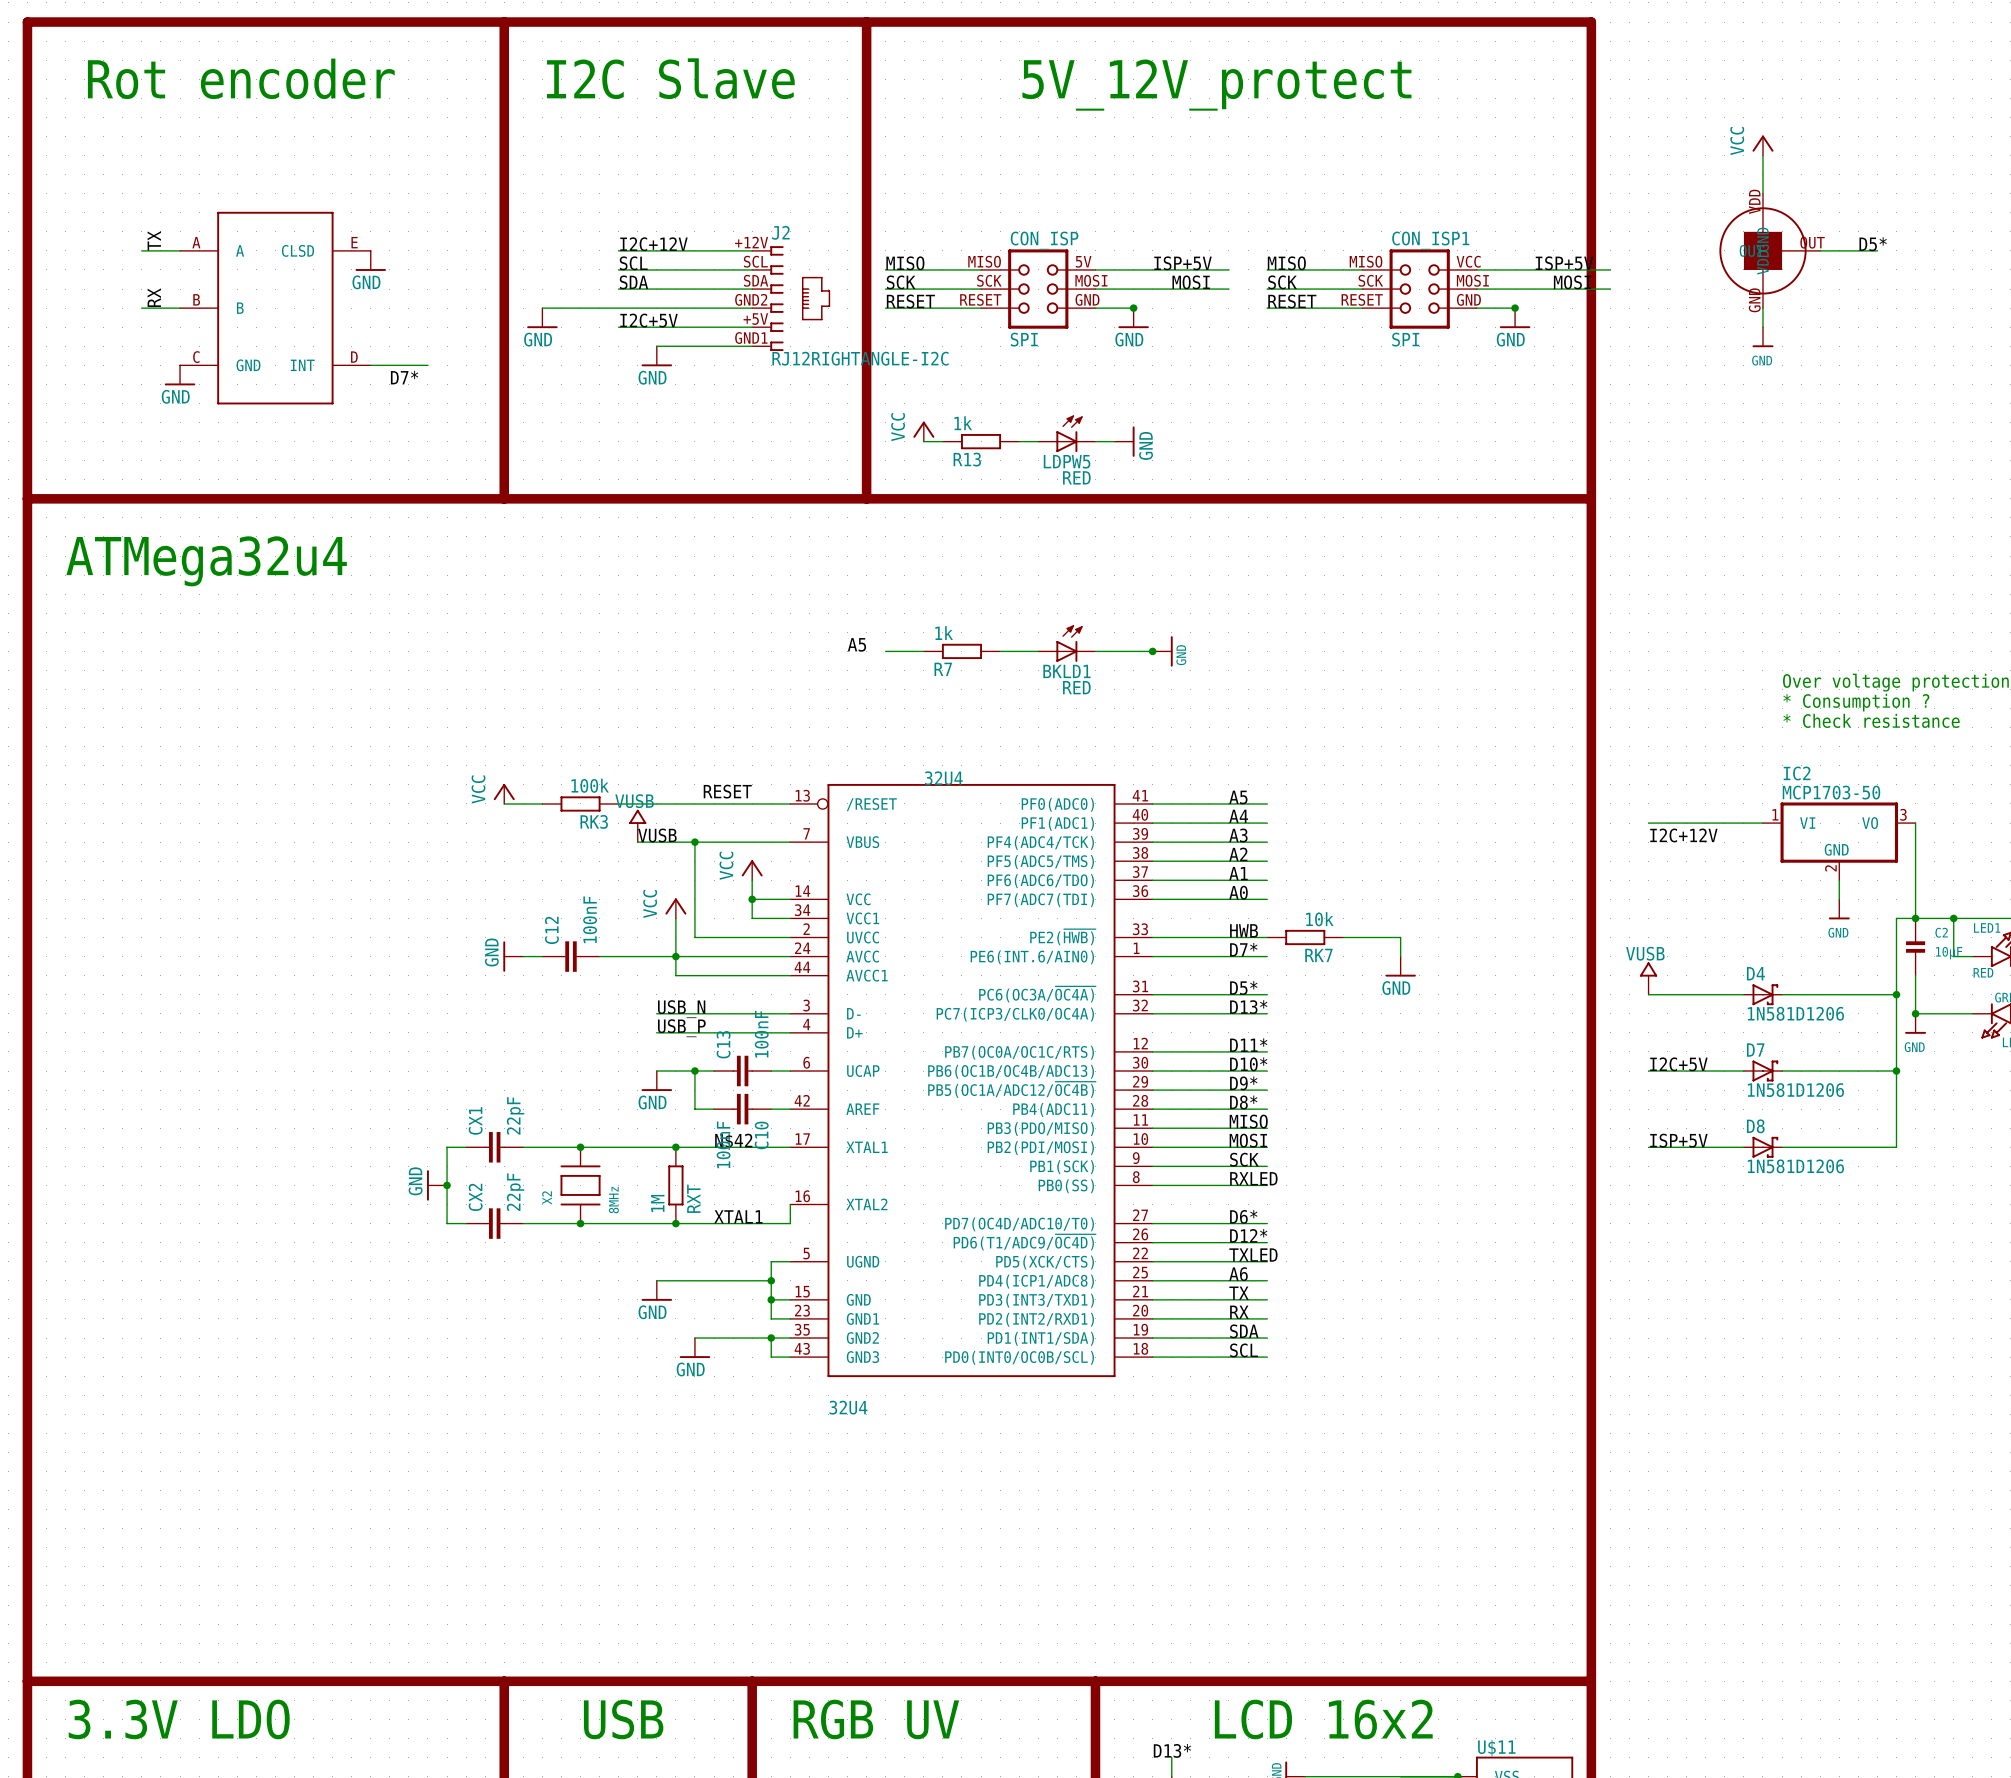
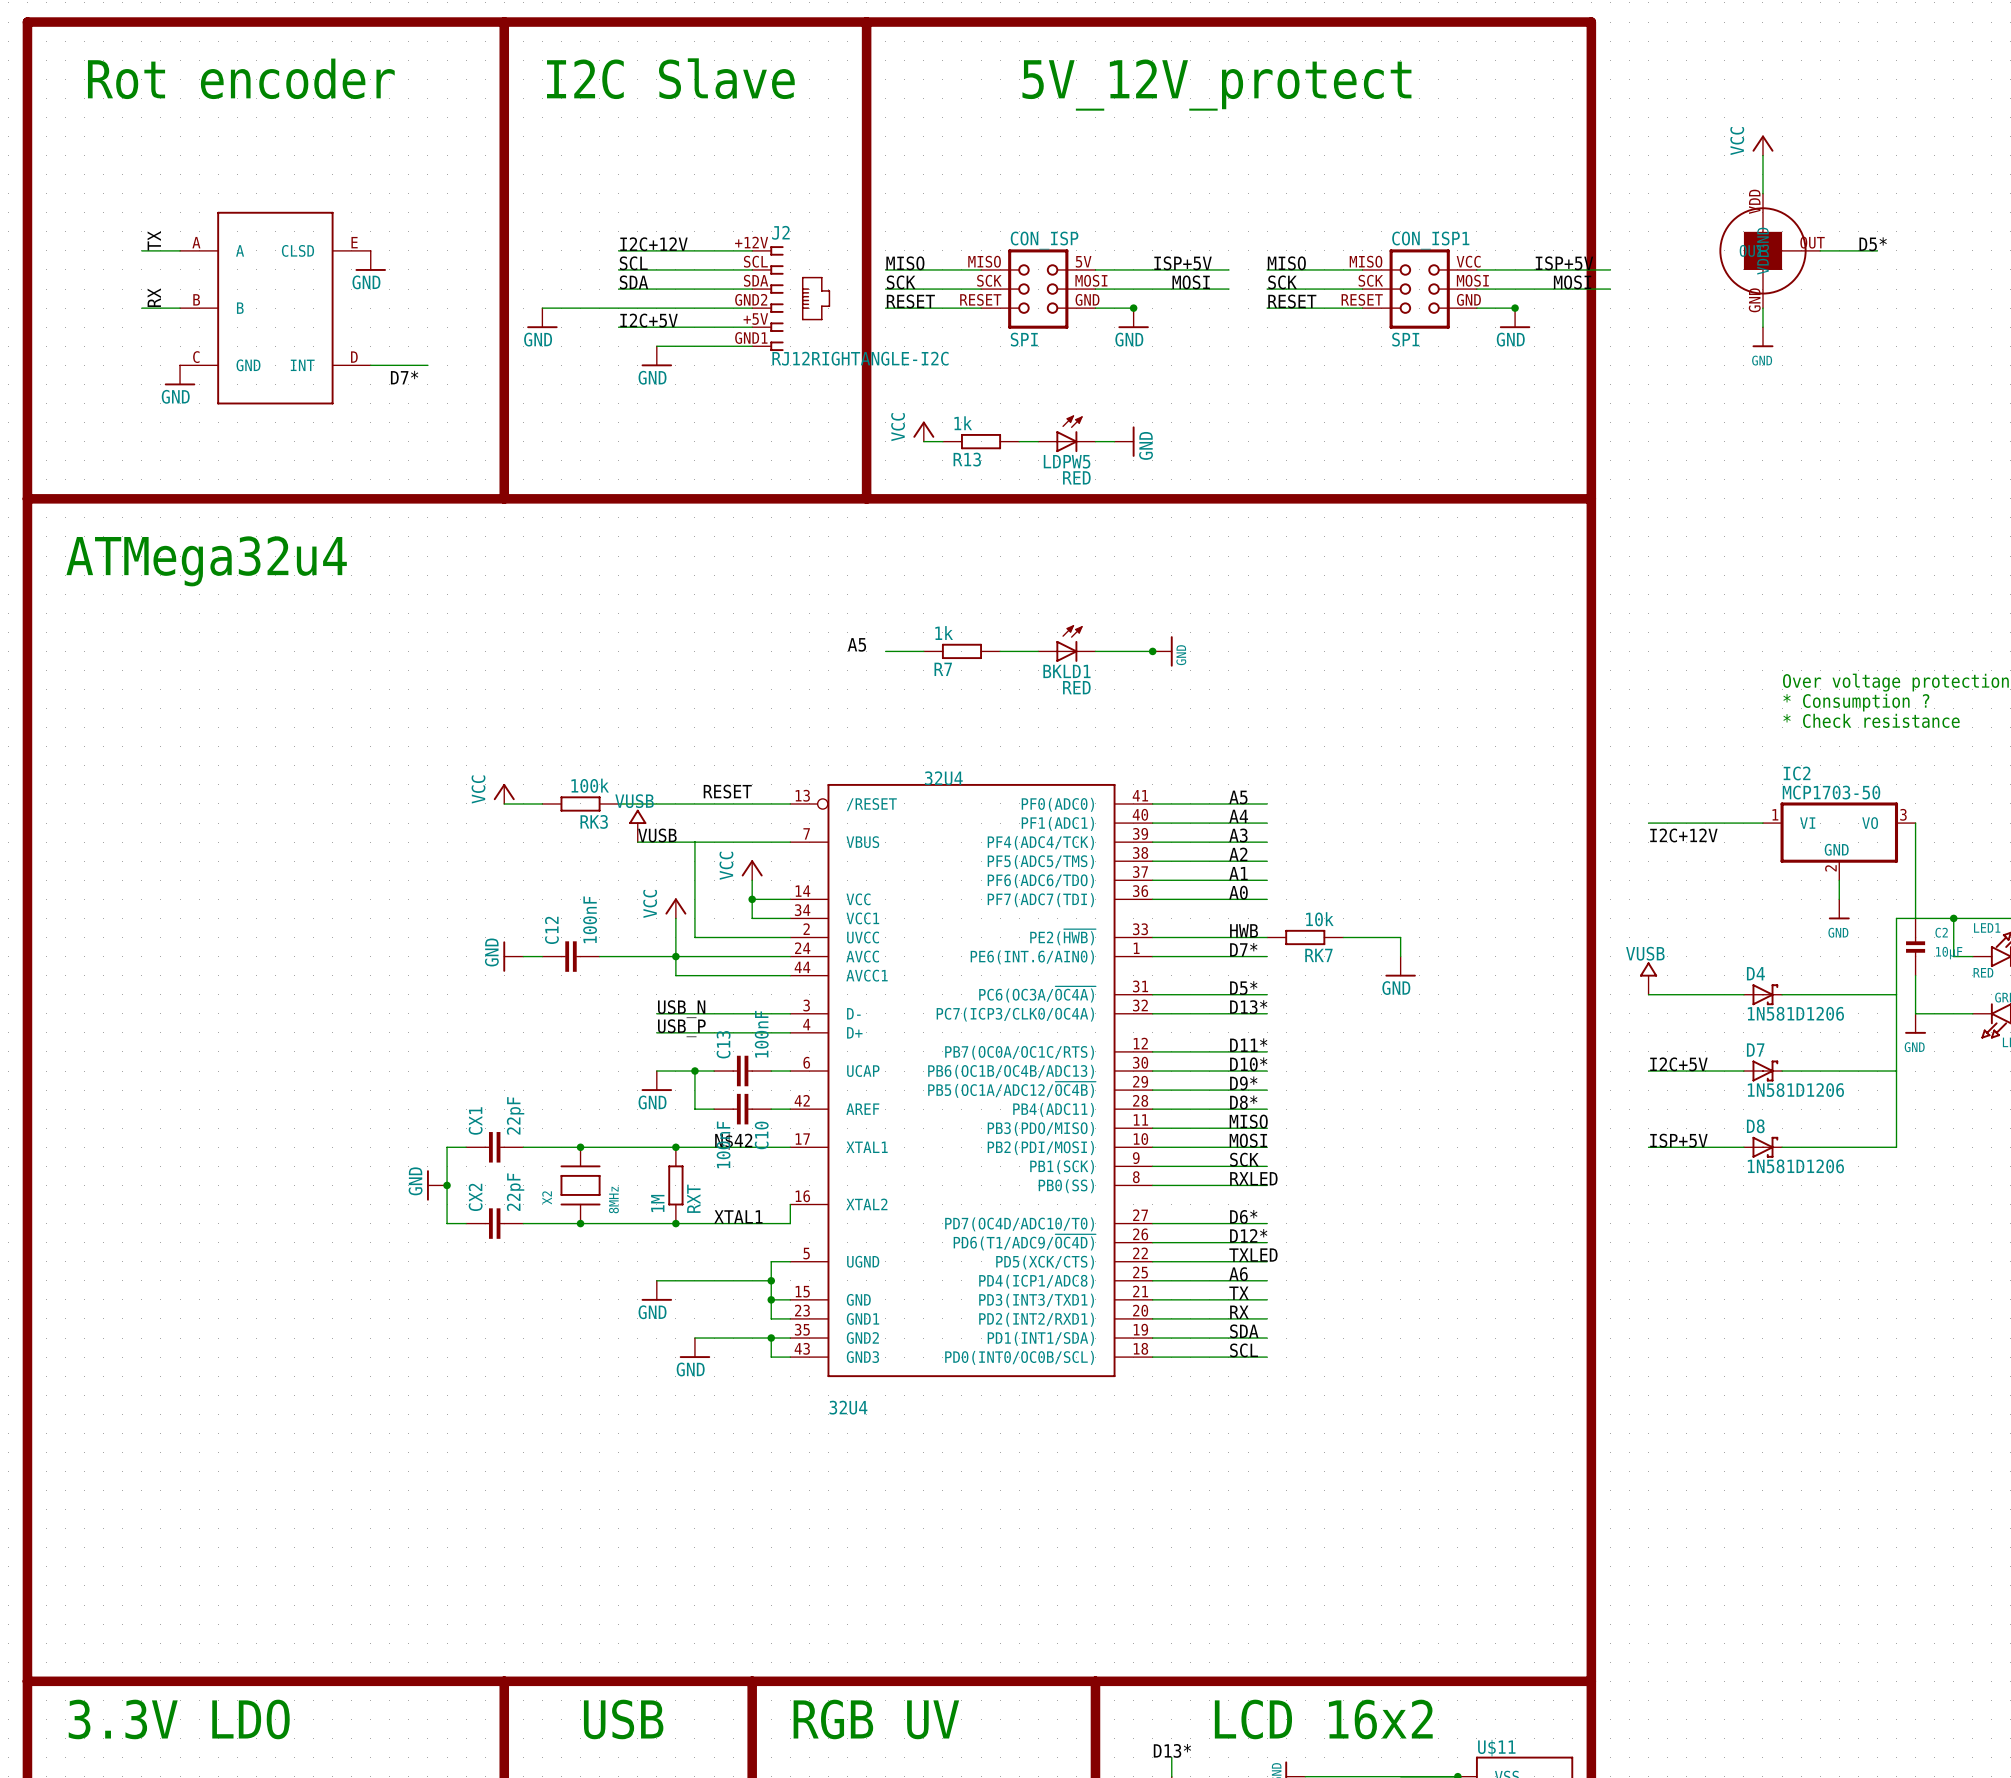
junction: (694, 842) -> none
junction: (1915, 918) -> none
junction: (1896, 994) -> none
junction: (1915, 1013) -> none
junction: (1896, 1071) -> none

